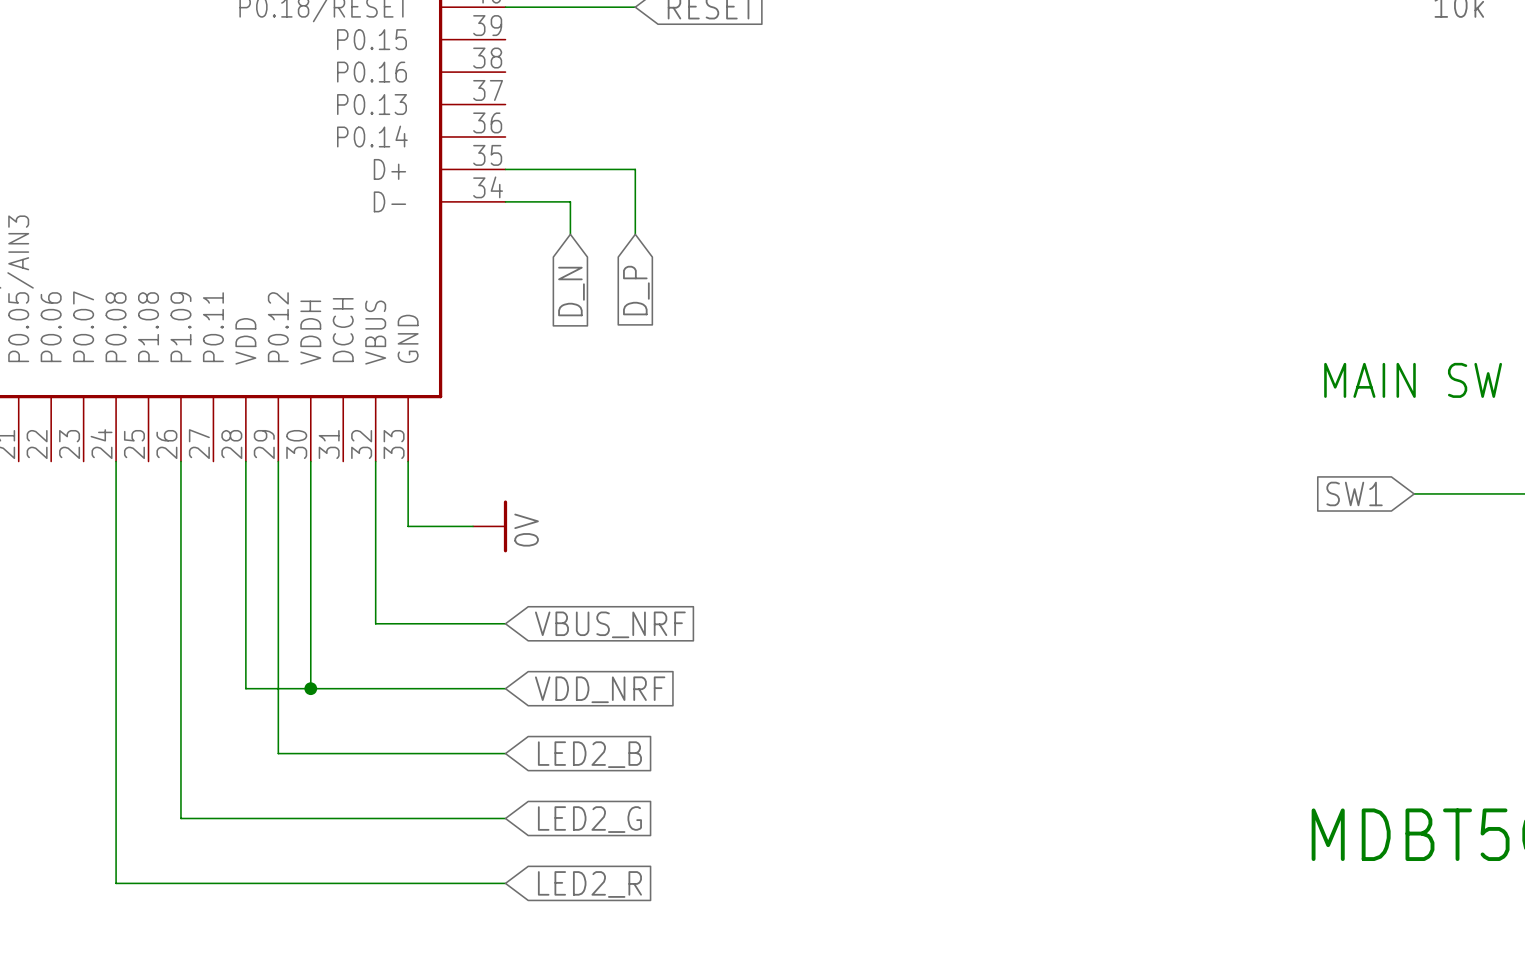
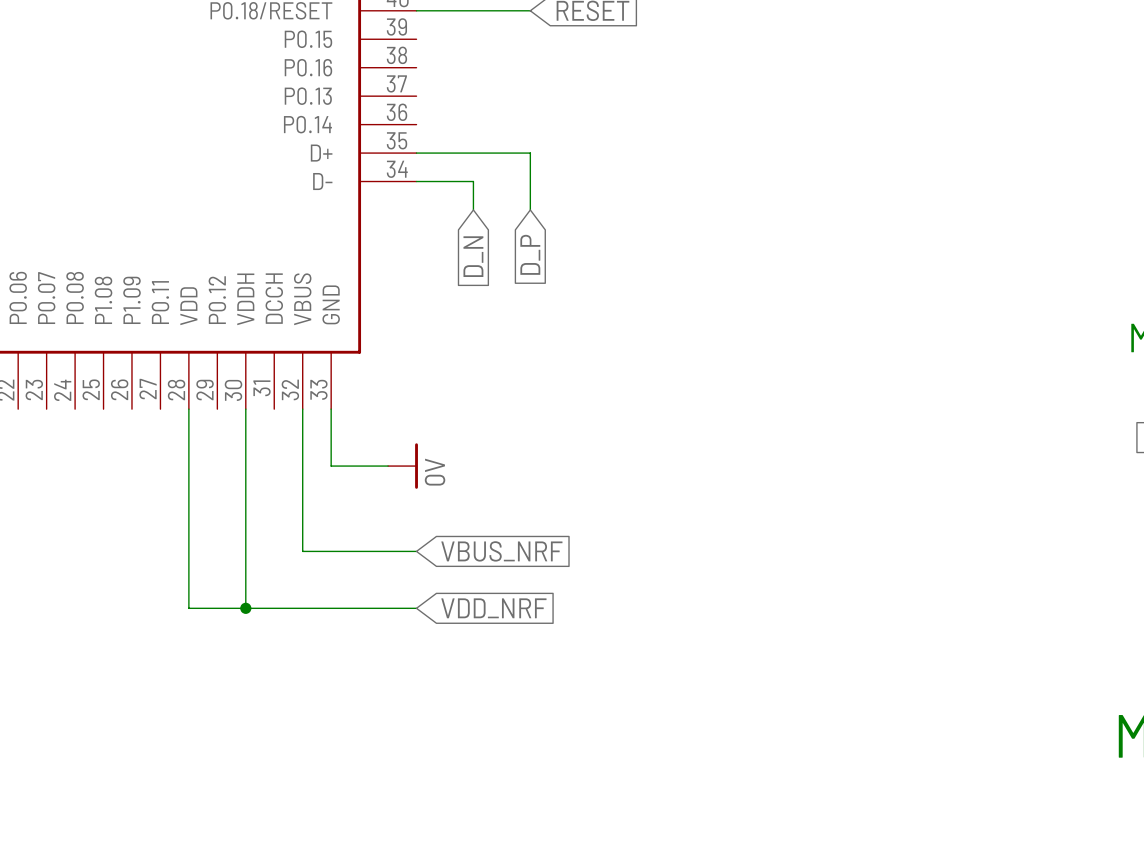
wire: (116, 461) (116, 883) (505, 883) -> none
wire: (180, 461) (180, 818) (505, 818) -> none
wire: (278, 461) (278, 753) (505, 753) -> none
global label: LED2_B (589, 754) -> none
global label: LED2_G (589, 819) -> none
global label: LED2_R (589, 884) -> none

